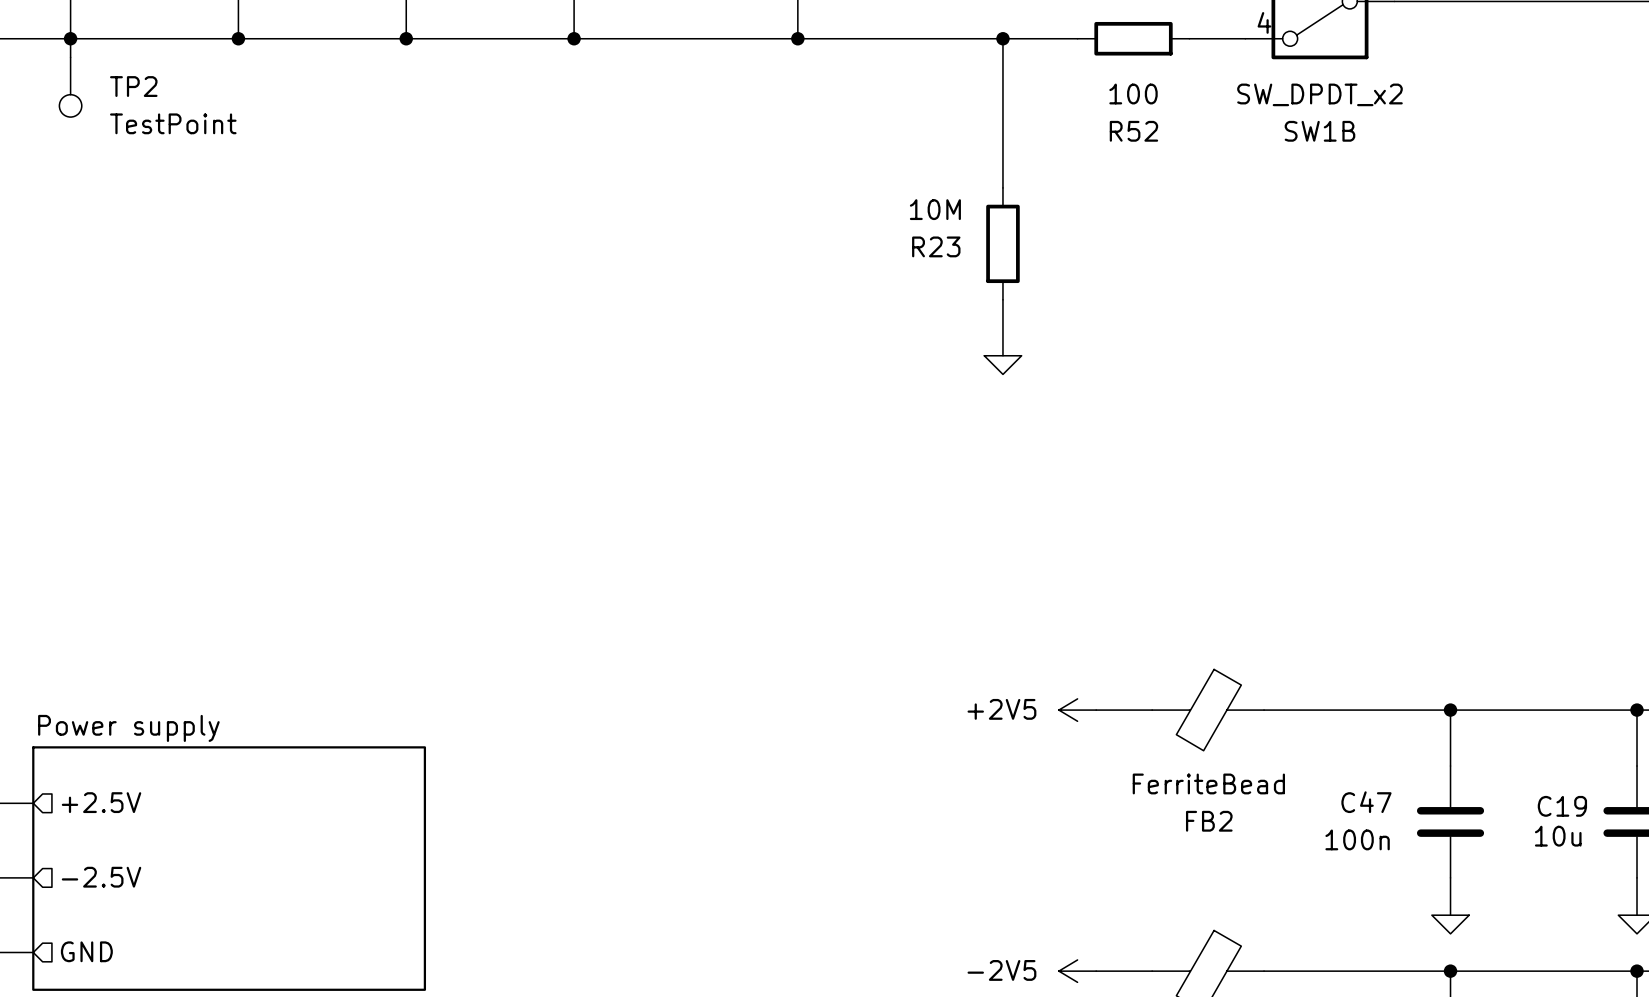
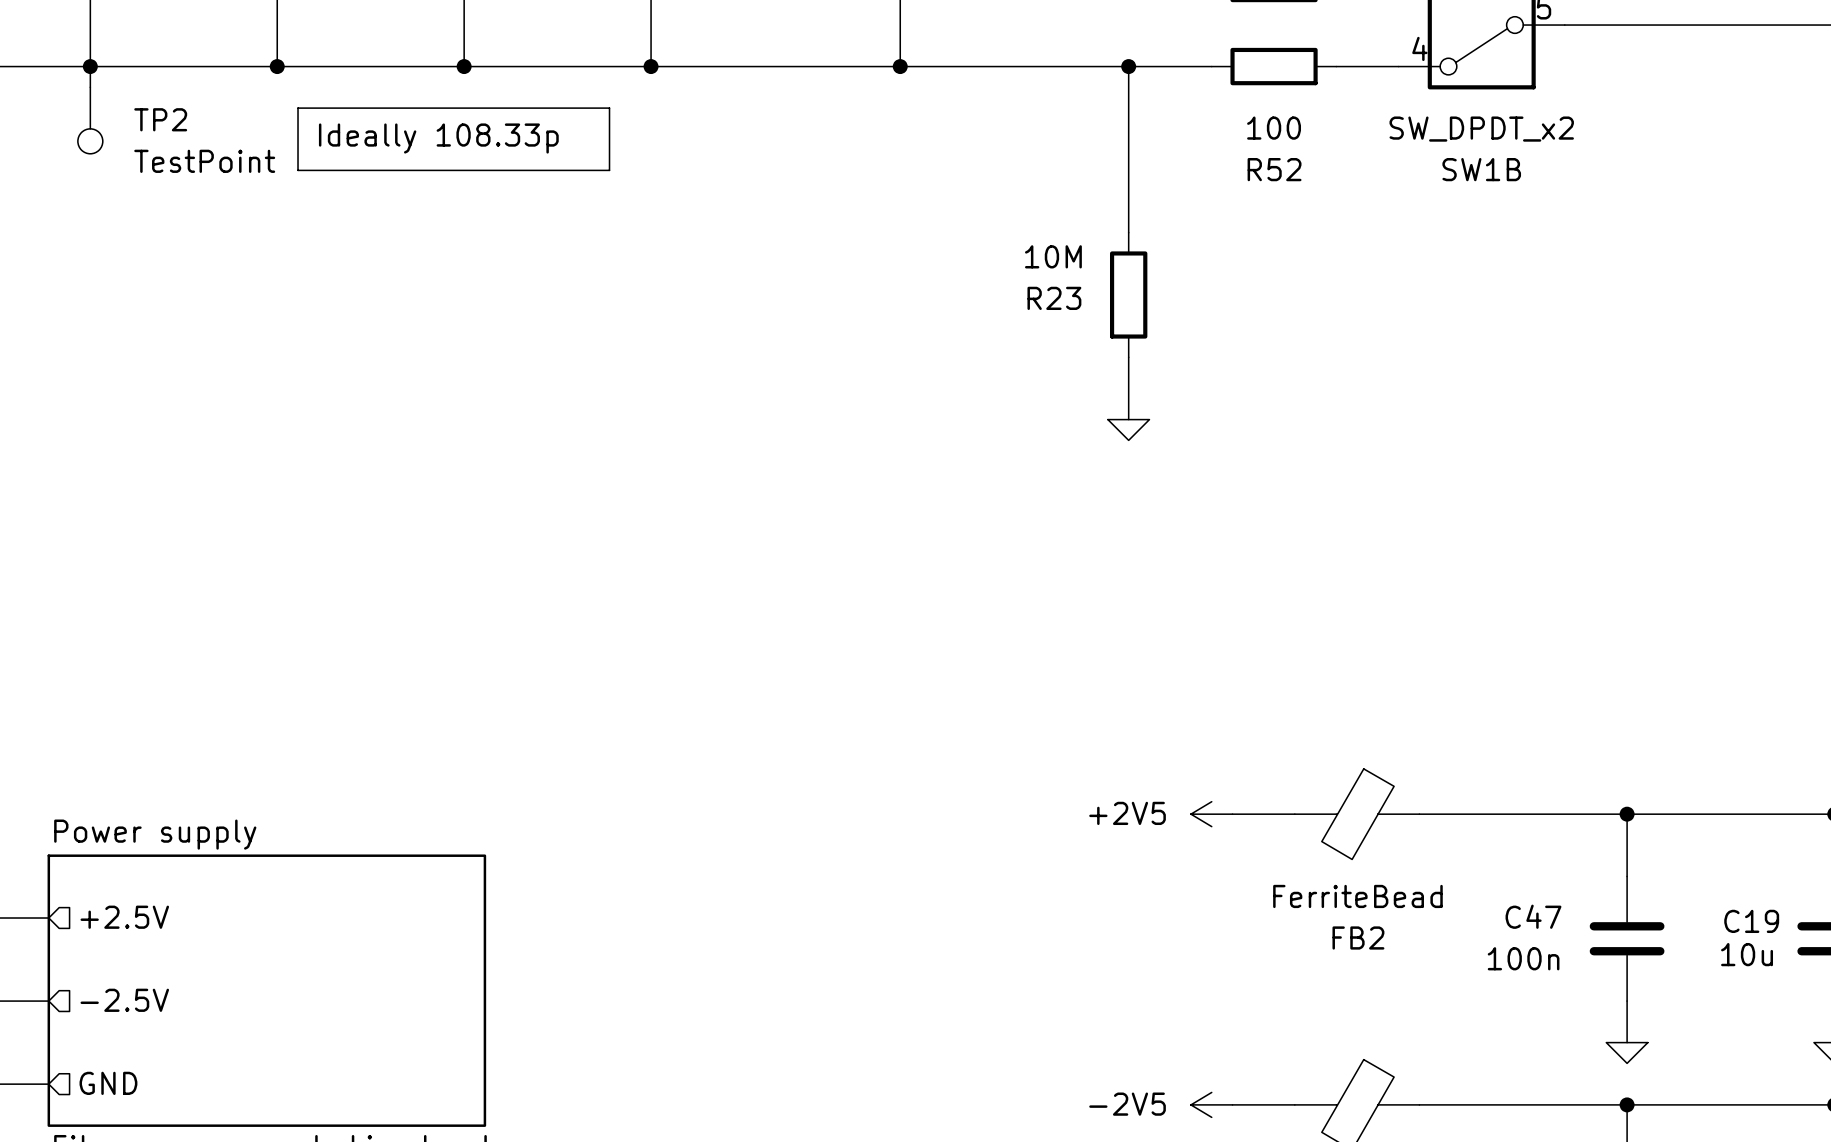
line: none -> (298, 108) (609, 108) (609, 170) (298, 170) (298, 108)
text: none -> Ideally 108.33p (438, 138)

